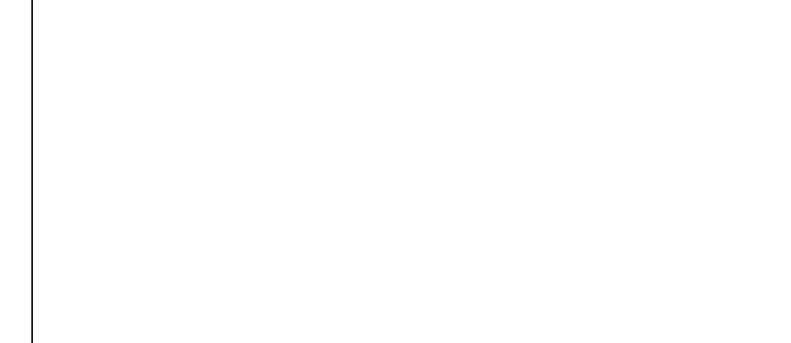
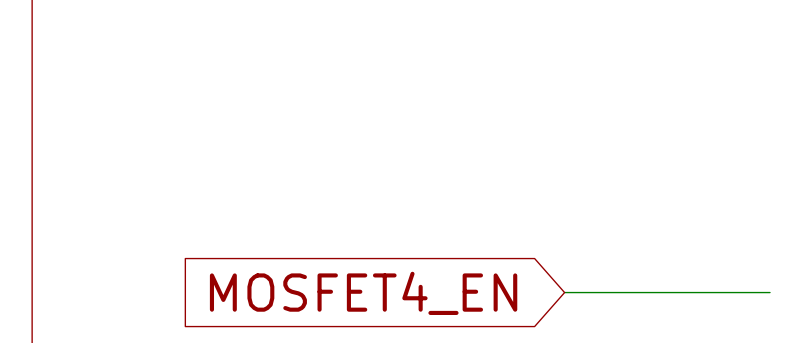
wire: none -> (564, 292) (770, 292)
global label: none -> MOSFET4_EN (363, 293)

